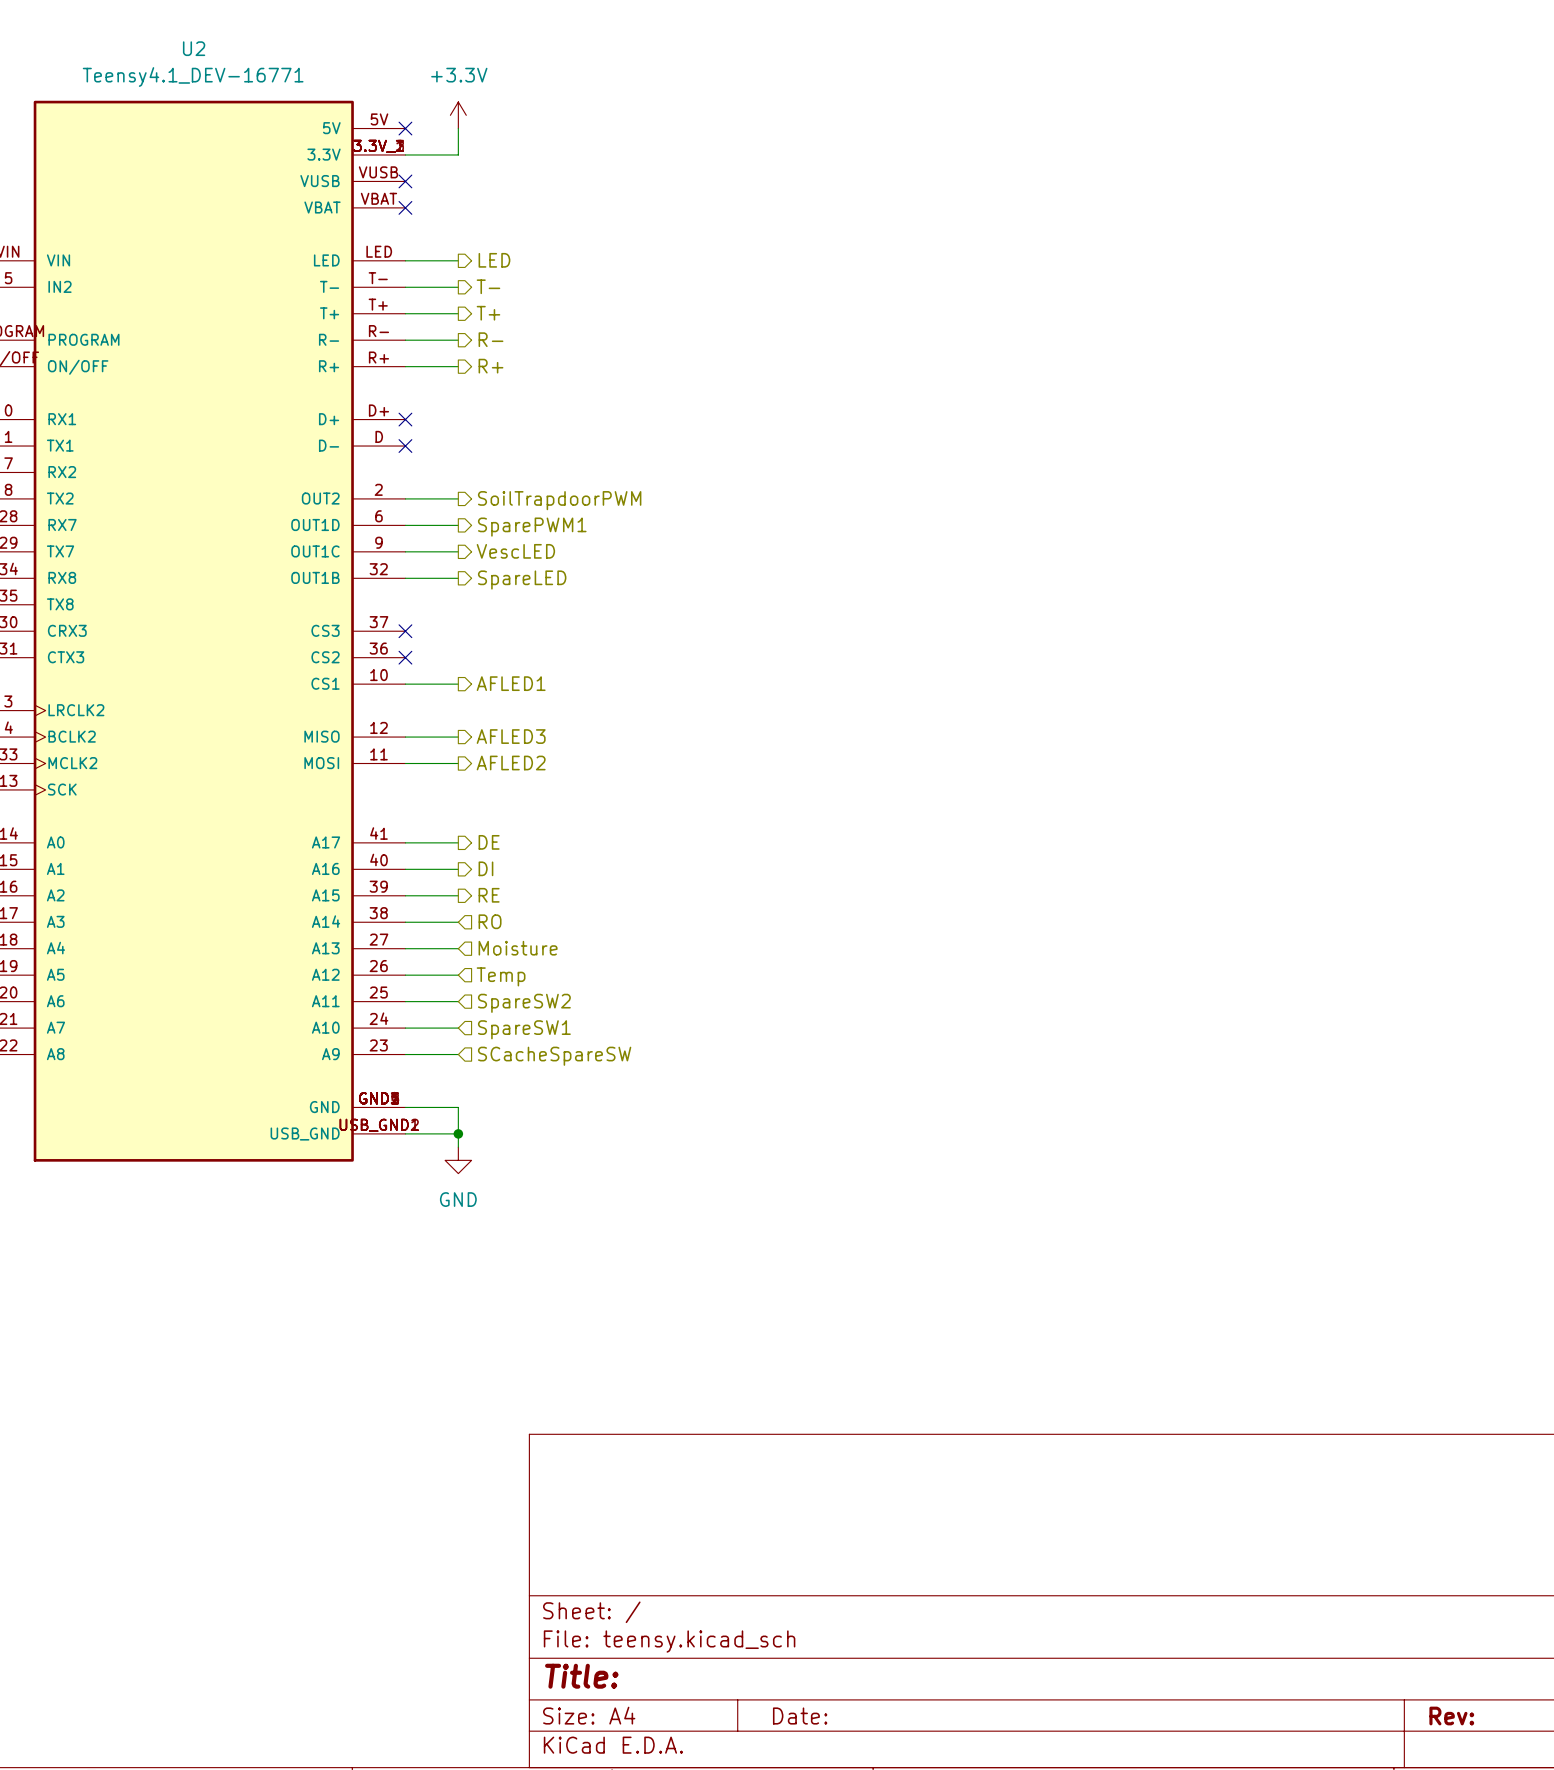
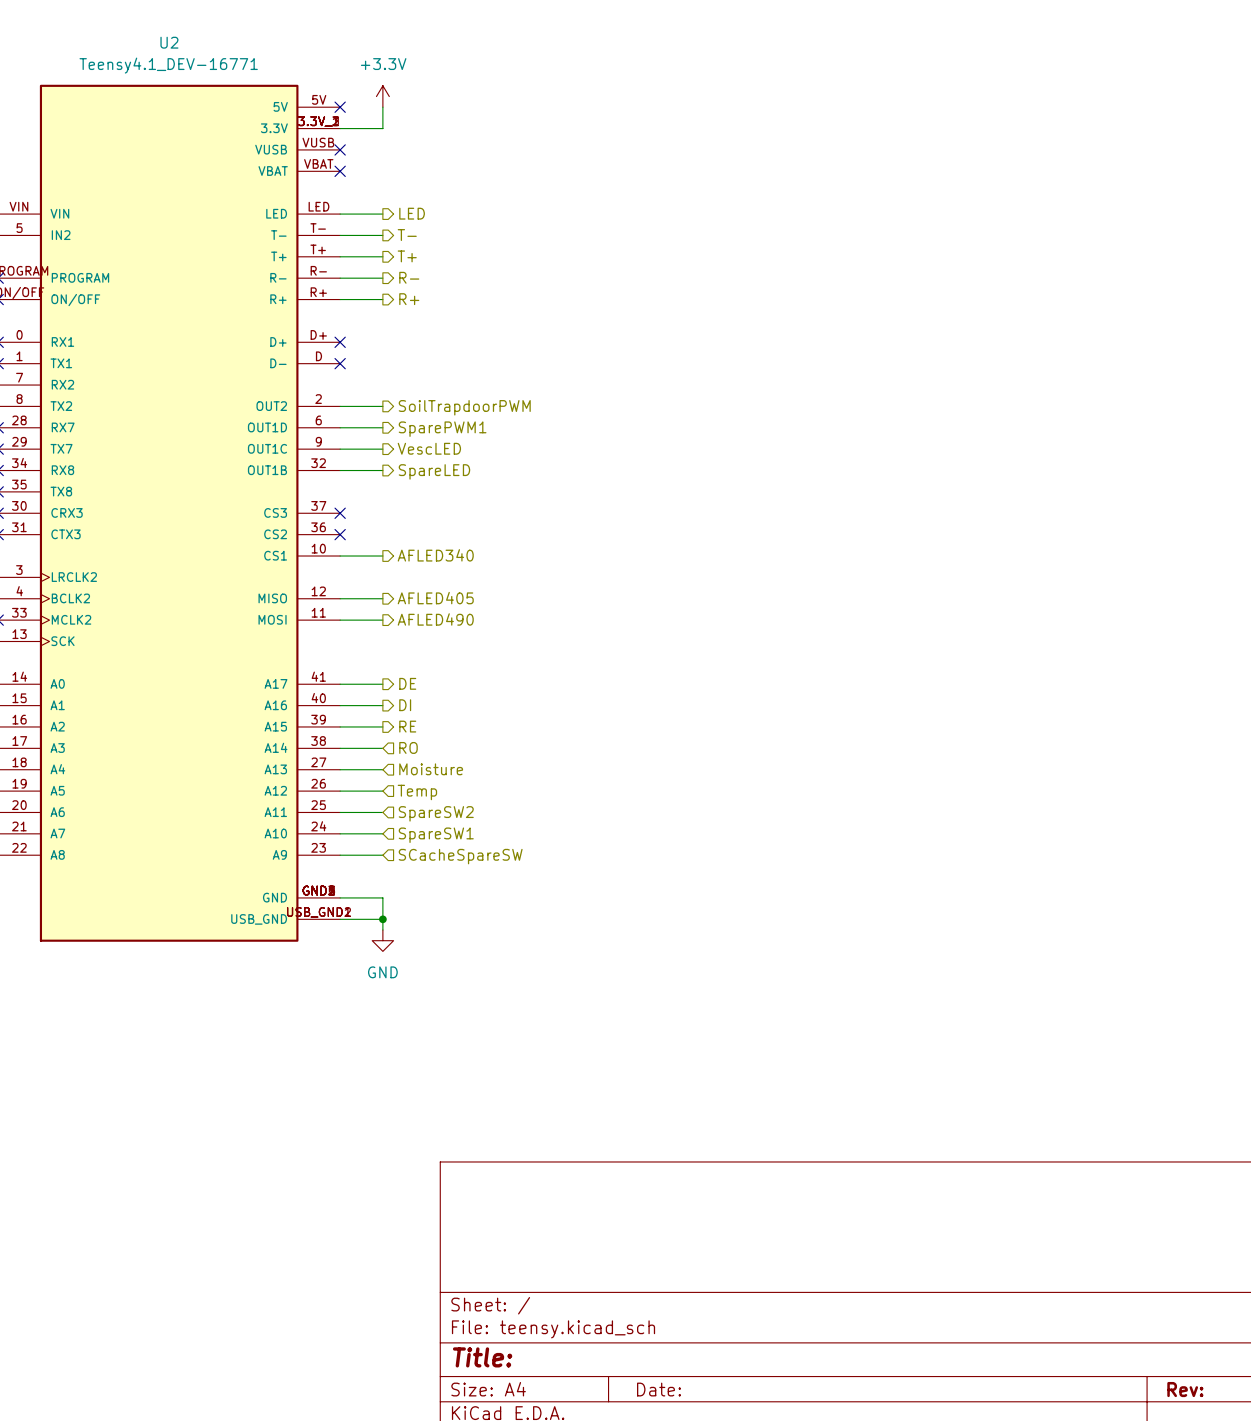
hierarchical label: AFLED1 (511, 683) -> AFLED340 (435, 555)
hierarchical label: AFLED3 (511, 736) -> AFLED405 (435, 598)
hierarchical label: AFLED2 (511, 763) -> AFLED490 (435, 619)

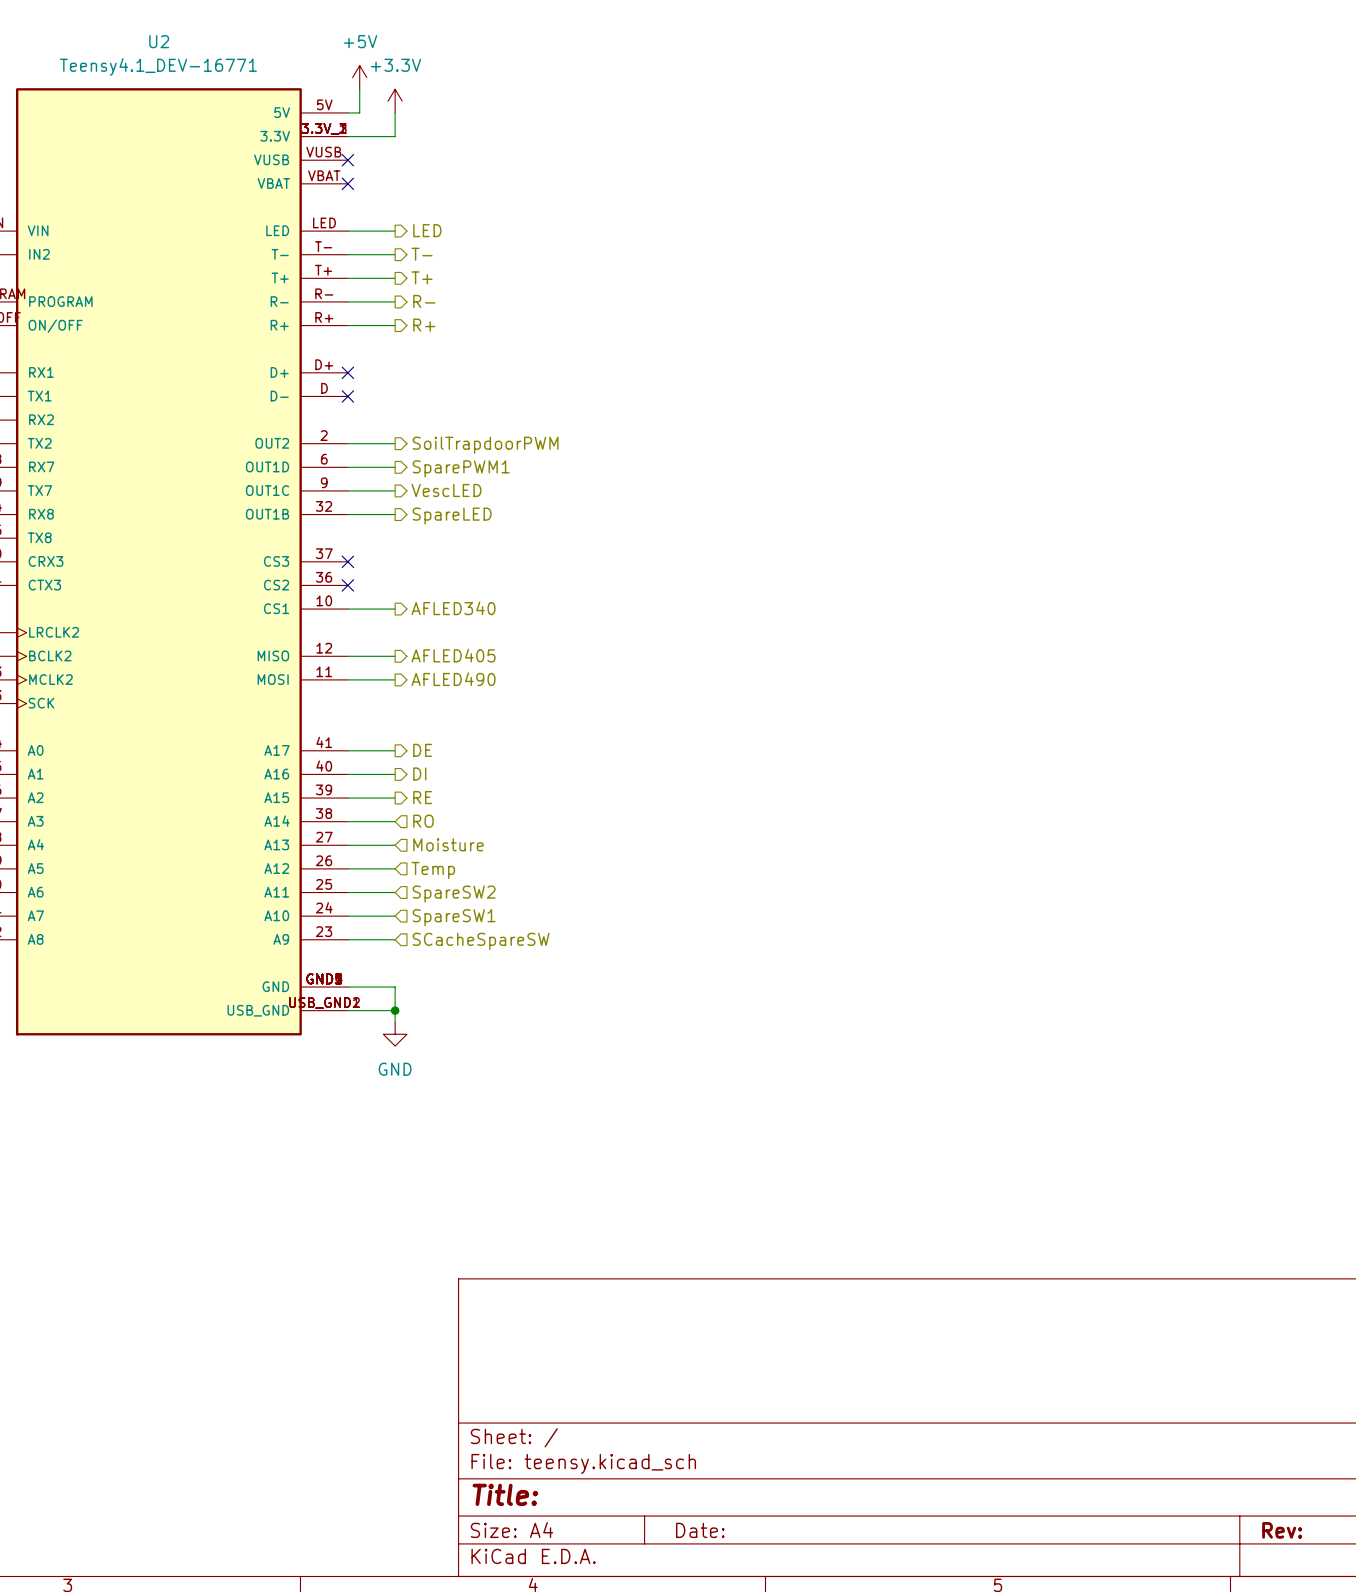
power symbol: none -> +5V (359, 77)
wire: none -> (359, 89) (359, 112) (347, 112)
no-connect mark: (340, 107) -> none

